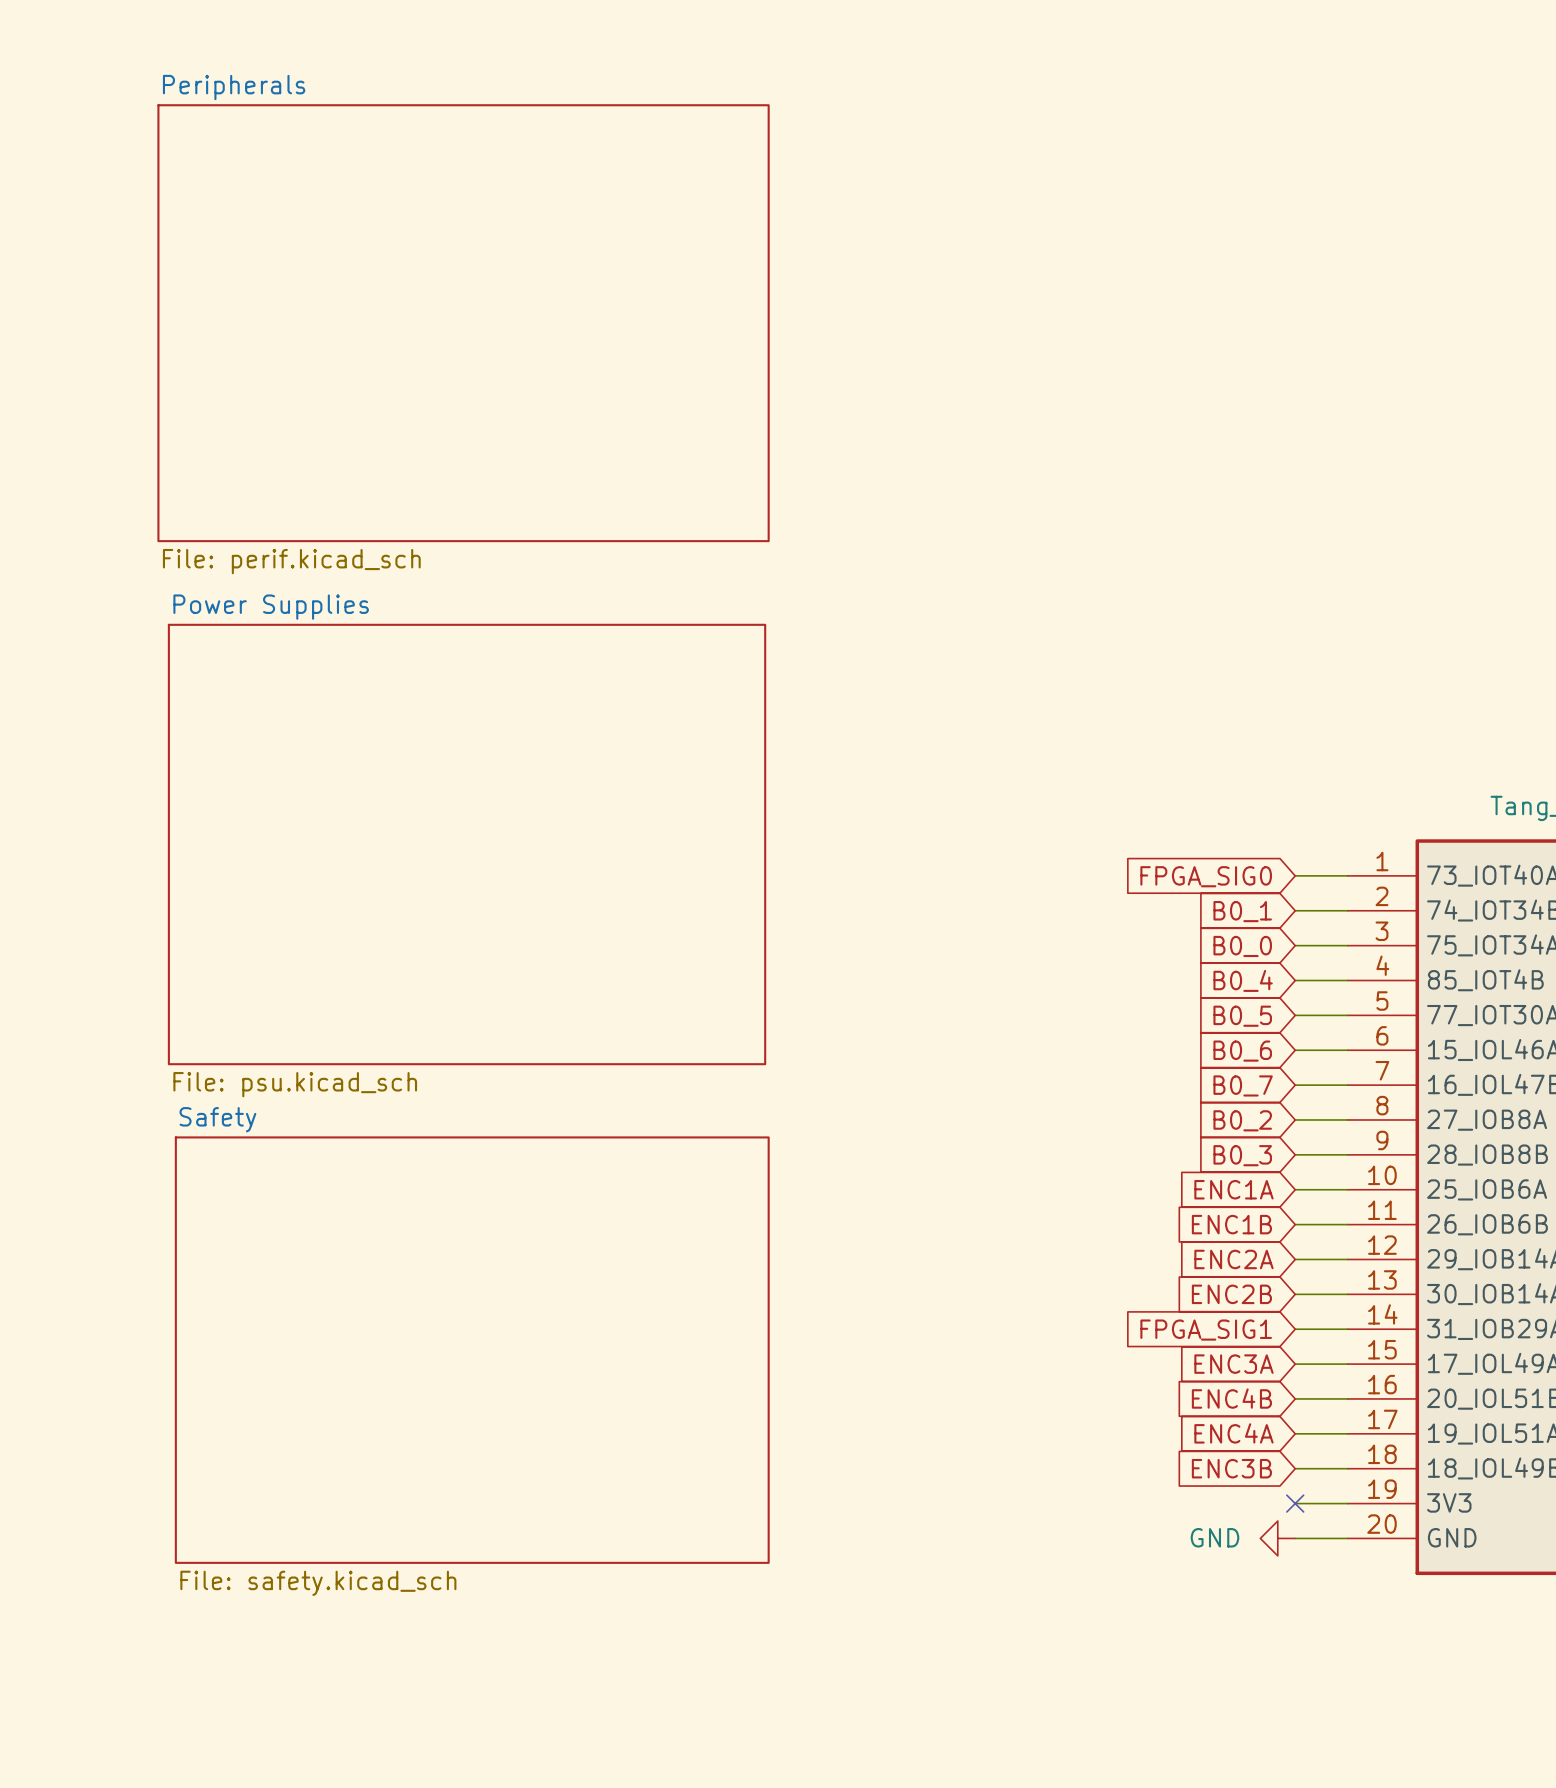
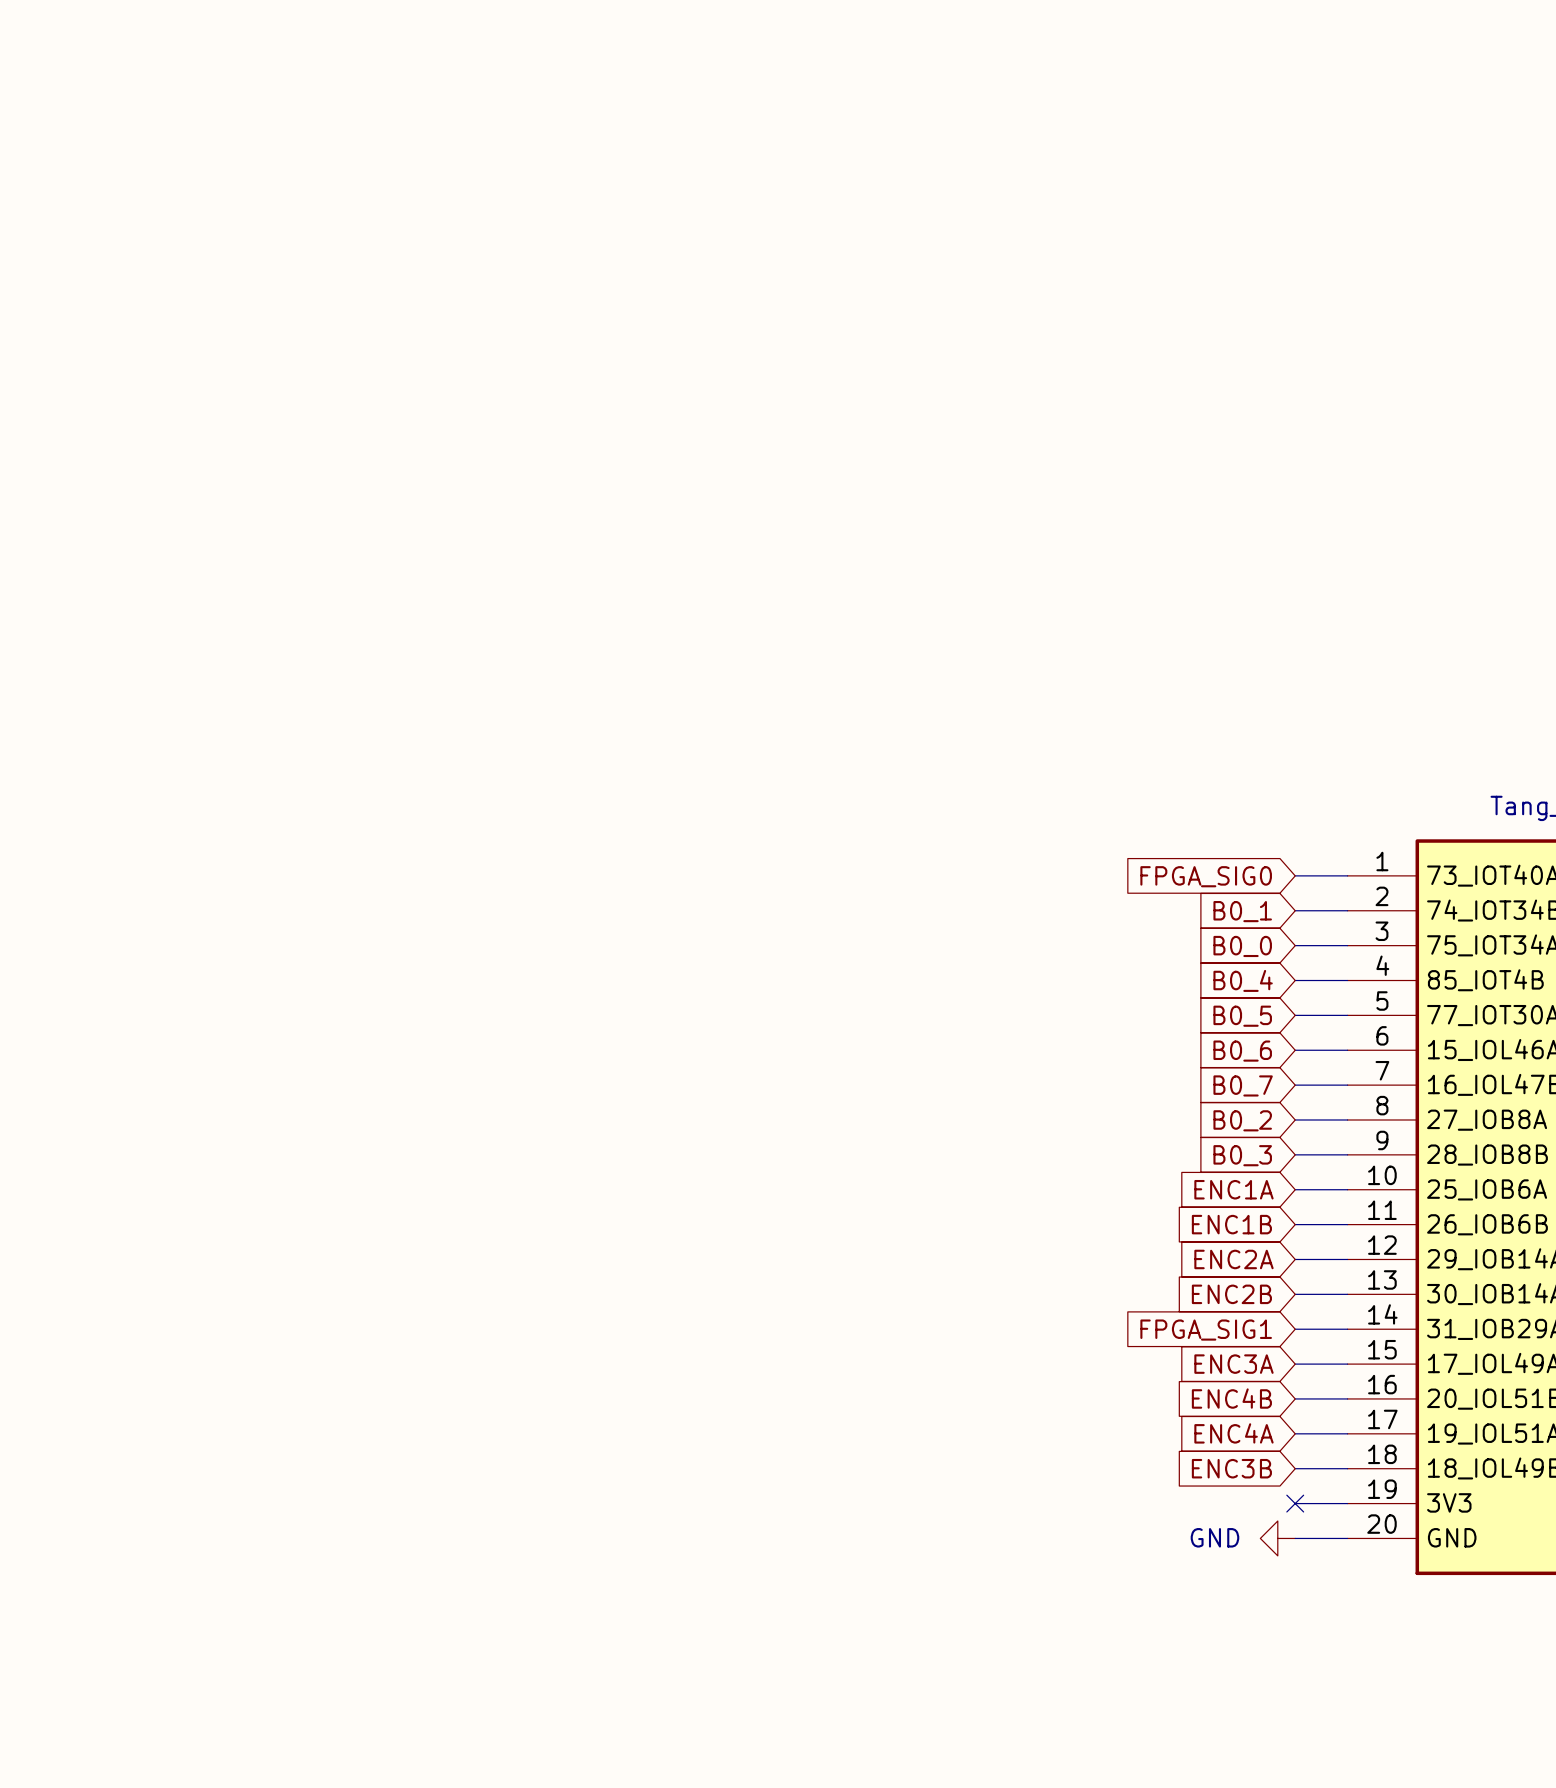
sheet Peripherals: File: perif.kicad_sch (463, 323) -> none
sheet Power Supplies: File: psu.kicad_sch (467, 844) -> none
sheet Safety: File: safety.kicad_sch (472, 1350) -> none

